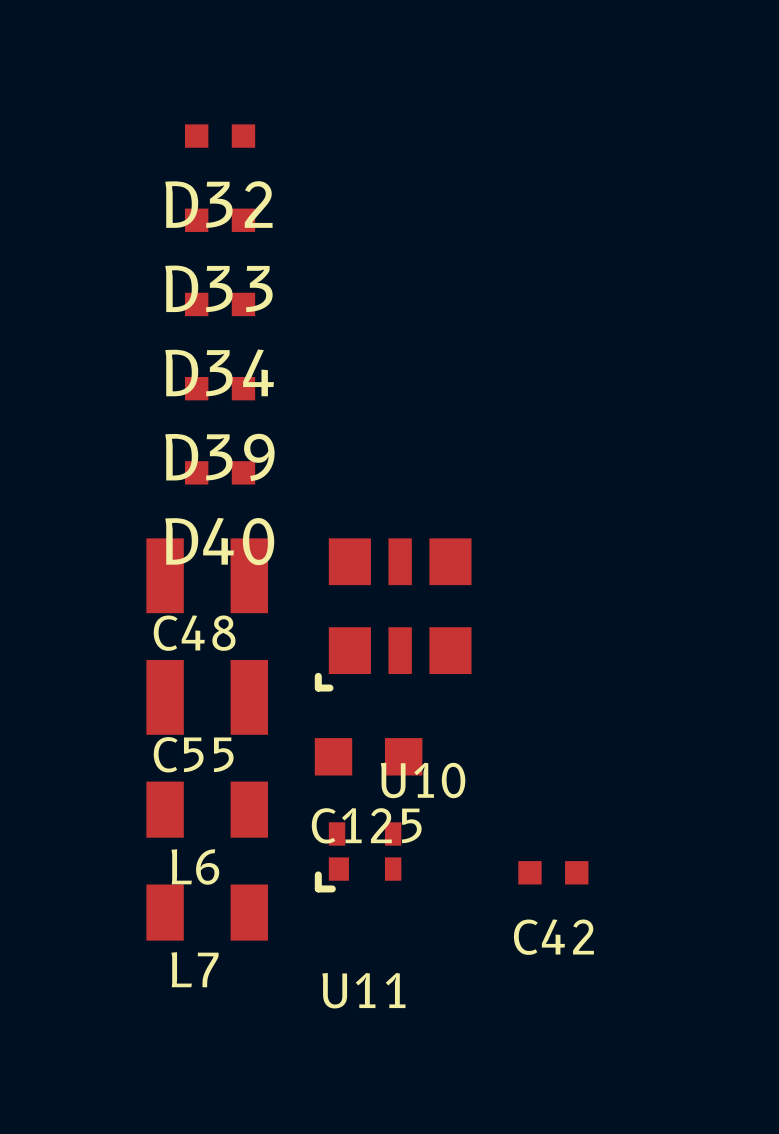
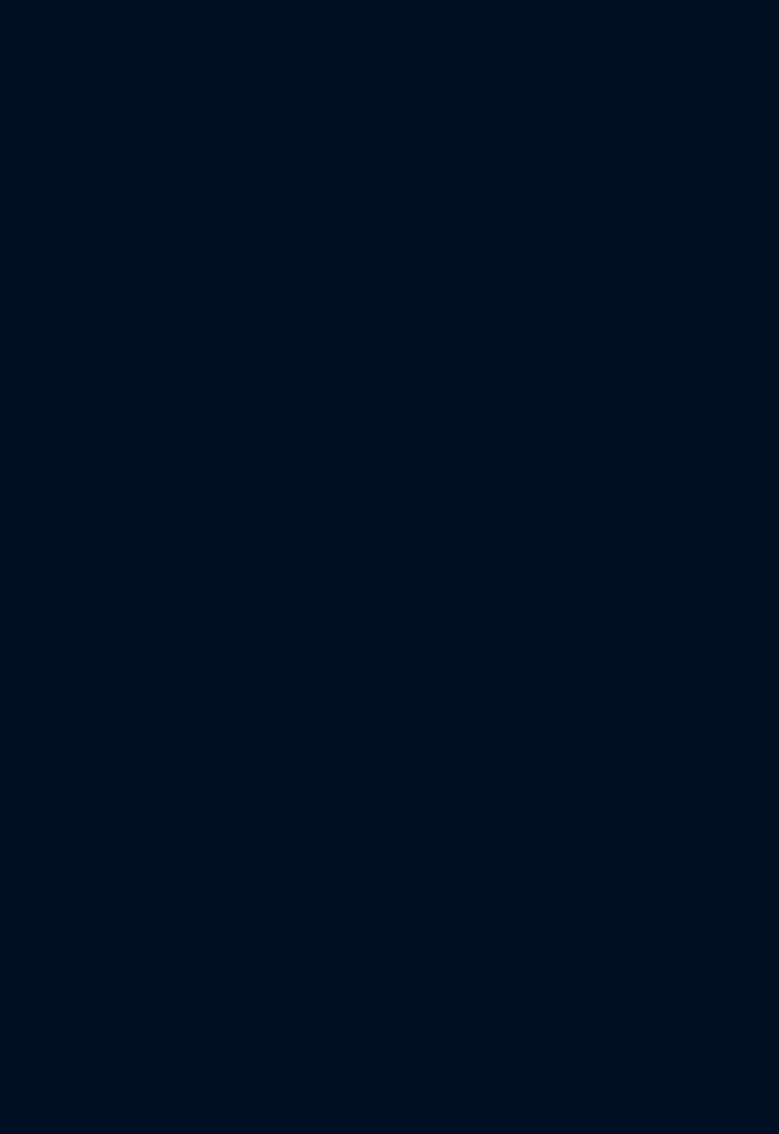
D32: (220, 136) -> none
D33: (220, 220) -> none
D34: (220, 304) -> none
D39: (220, 388) -> none
D40: (220, 472) -> none
C48: (207, 575) -> none
U10: (393, 614) -> none
C55: (207, 697) -> none
C125: (368, 756) -> none
L6: (207, 809) -> none
U11: (358, 857) -> none
C42: (553, 872) -> none
L7: (207, 912) -> none

